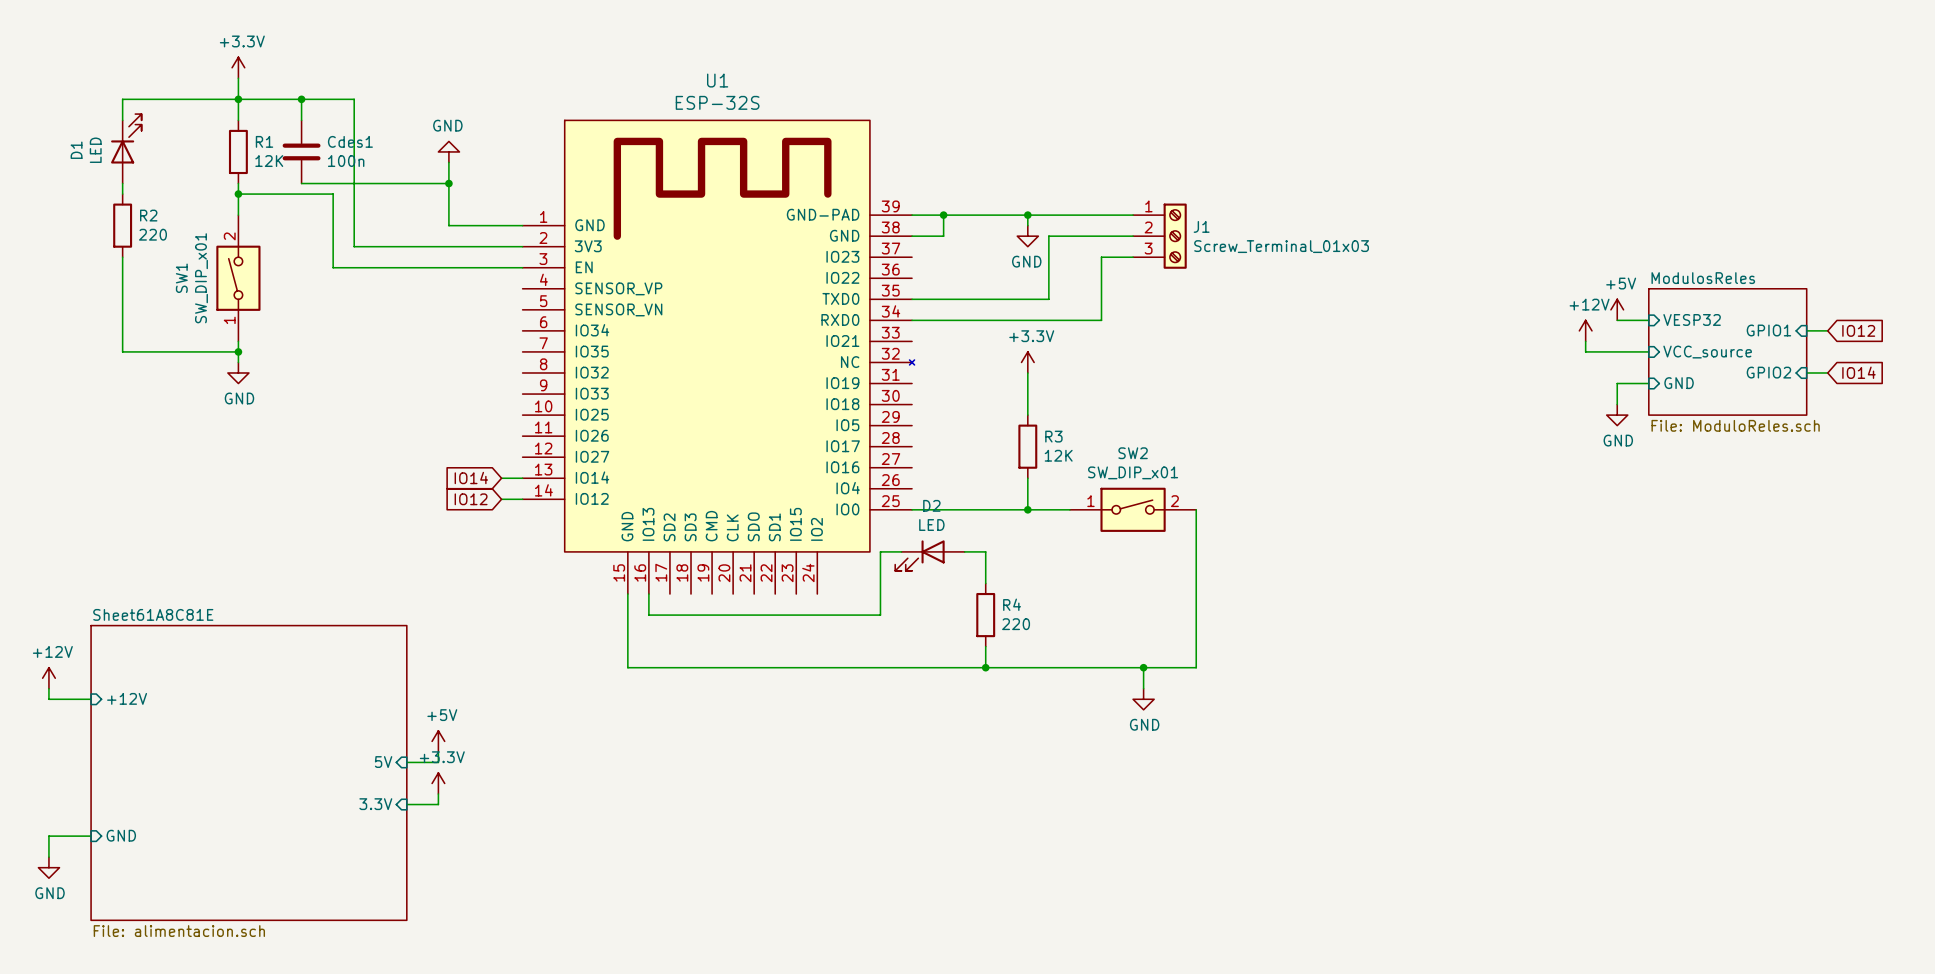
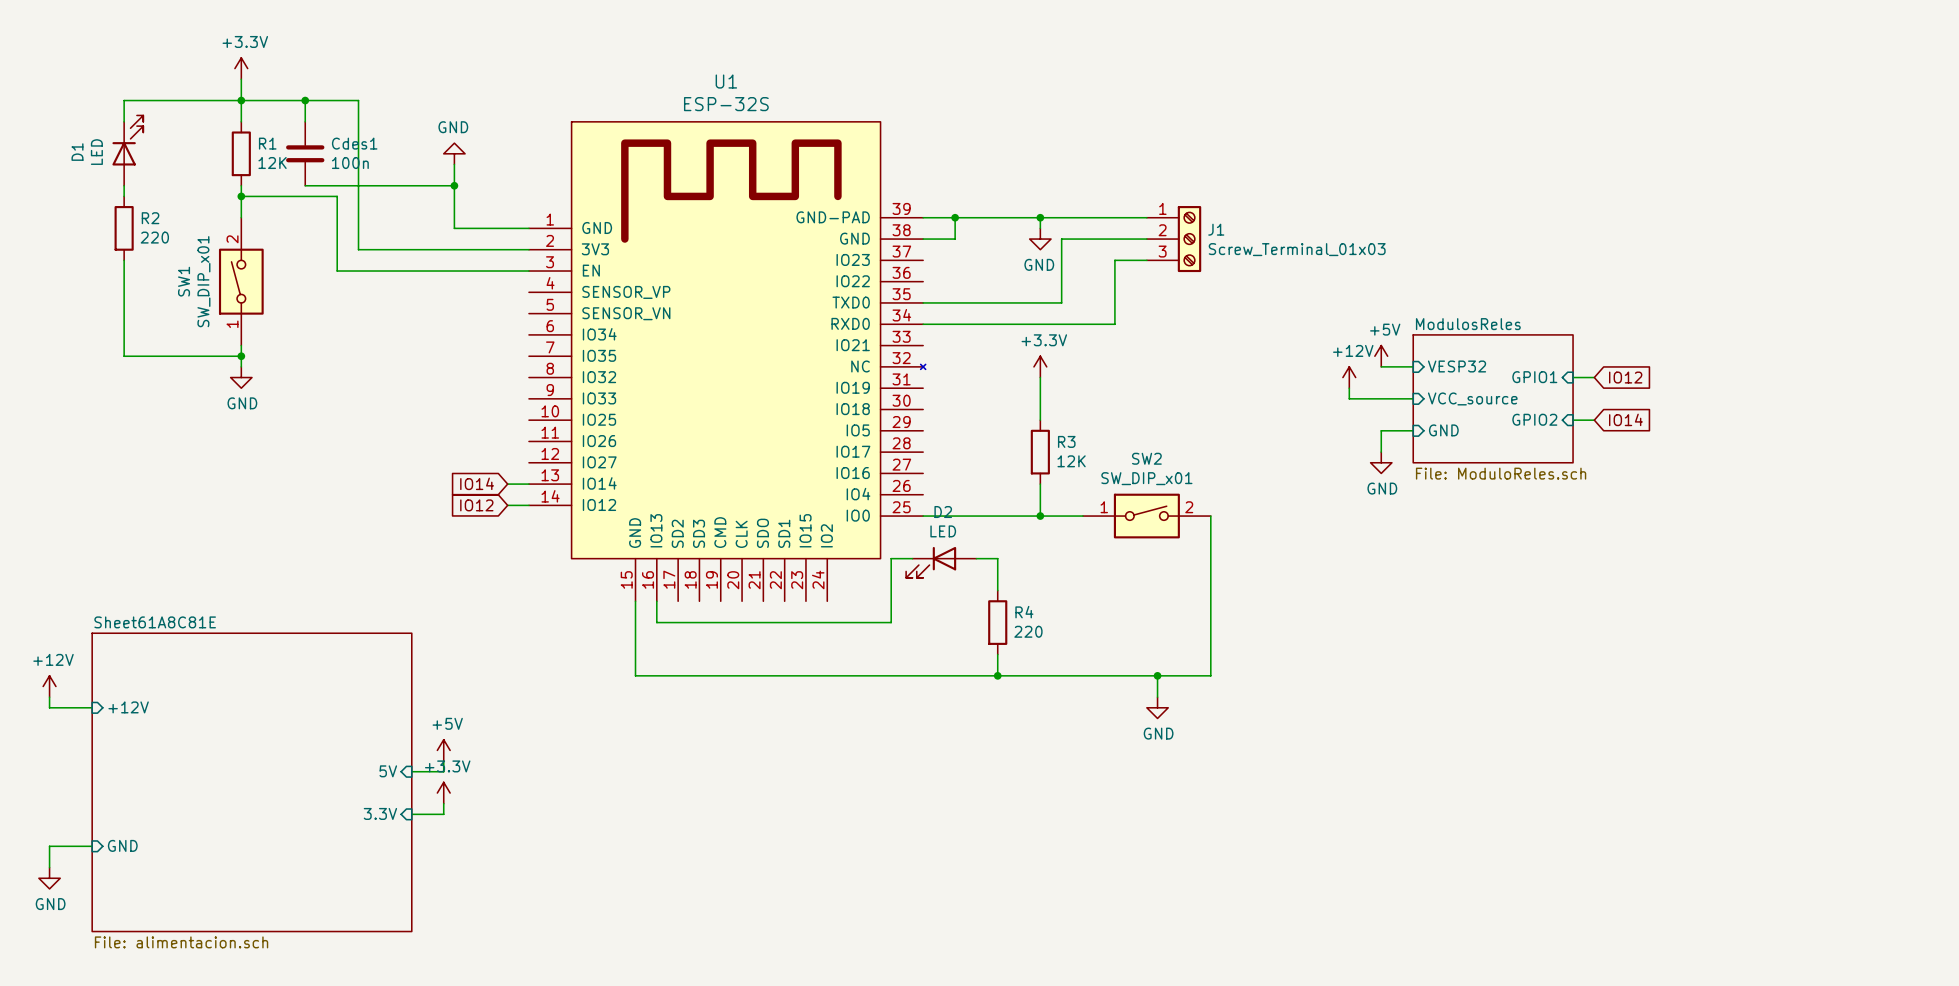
power symbol: +5V (1617, 309) -> none
sheet pin: VESP32 (1692, 319) -> none
wire: (1617, 320) (1648, 320) -> none
power symbol: +12V (1585, 330) -> none
sheet pin: GPIO1 (1768, 330) -> none
wire: (1806, 330) (1827, 330) -> none
global label: IO12 (1858, 330) -> none
wire: (1585, 341) (1585, 351) (1648, 351) -> none
power symbol: none -> +5V (1381, 356)
sheet ModulosReles: File: ModuloReles.sch (1727, 351) -> none
sheet pin: VCC_source (1707, 352) -> none
wire: none -> (1381, 366) (1413, 366)
sheet pin: none -> VESP32 (1457, 366)
power symbol: none -> +12V (1349, 377)
sheet pin: none -> GPIO1 (1534, 377)
wire: none -> (1573, 377) (1594, 377)
global label: none -> IO12 (1625, 377)
sheet pin: GPIO2 (1768, 372) -> none
wire: (1806, 372) (1827, 372) -> none
global label: IO14 (1858, 372) -> none
wire: none -> (1349, 388) (1349, 398) (1413, 398)
wire: (1648, 383) (1617, 383) (1617, 404) -> none
sheet pin: GND (1679, 383) -> none
sheet pin: none -> VCC_source (1472, 398)
sheet ModulosReles: none -> File: ModuloReles.sch (1493, 398)
sheet pin: none -> GPIO2 (1534, 419)
global label: none -> IO14 (1625, 419)
wire: none -> (1573, 420) (1594, 420)
power symbol: GND (1617, 415) -> none
wire: none -> (1413, 430) (1381, 430) (1381, 452)
sheet pin: none -> GND (1443, 430)
power symbol: none -> GND (1381, 462)

